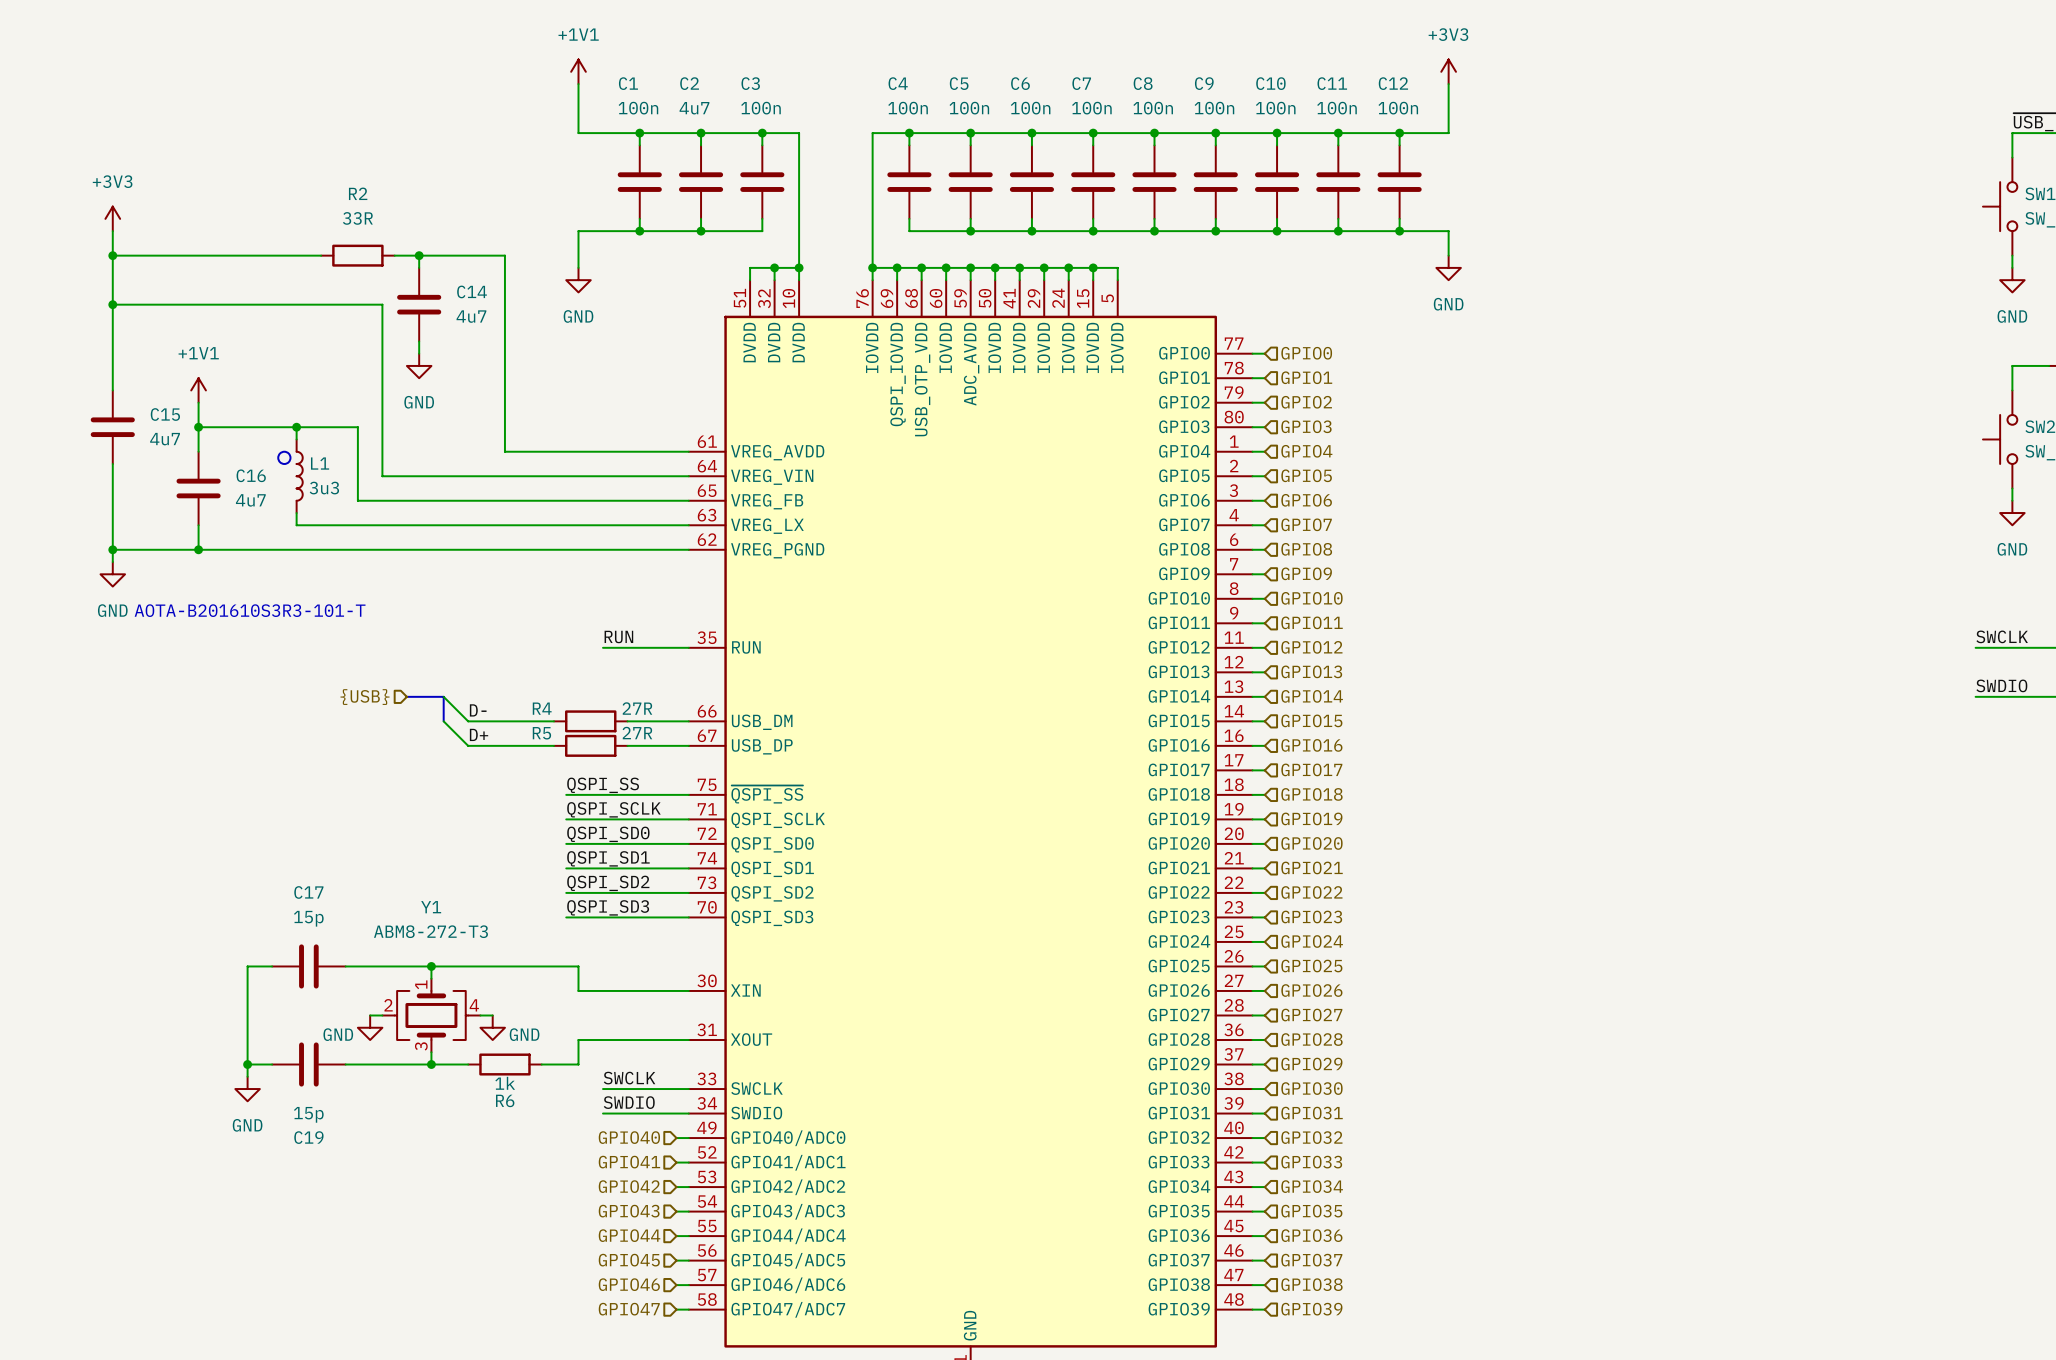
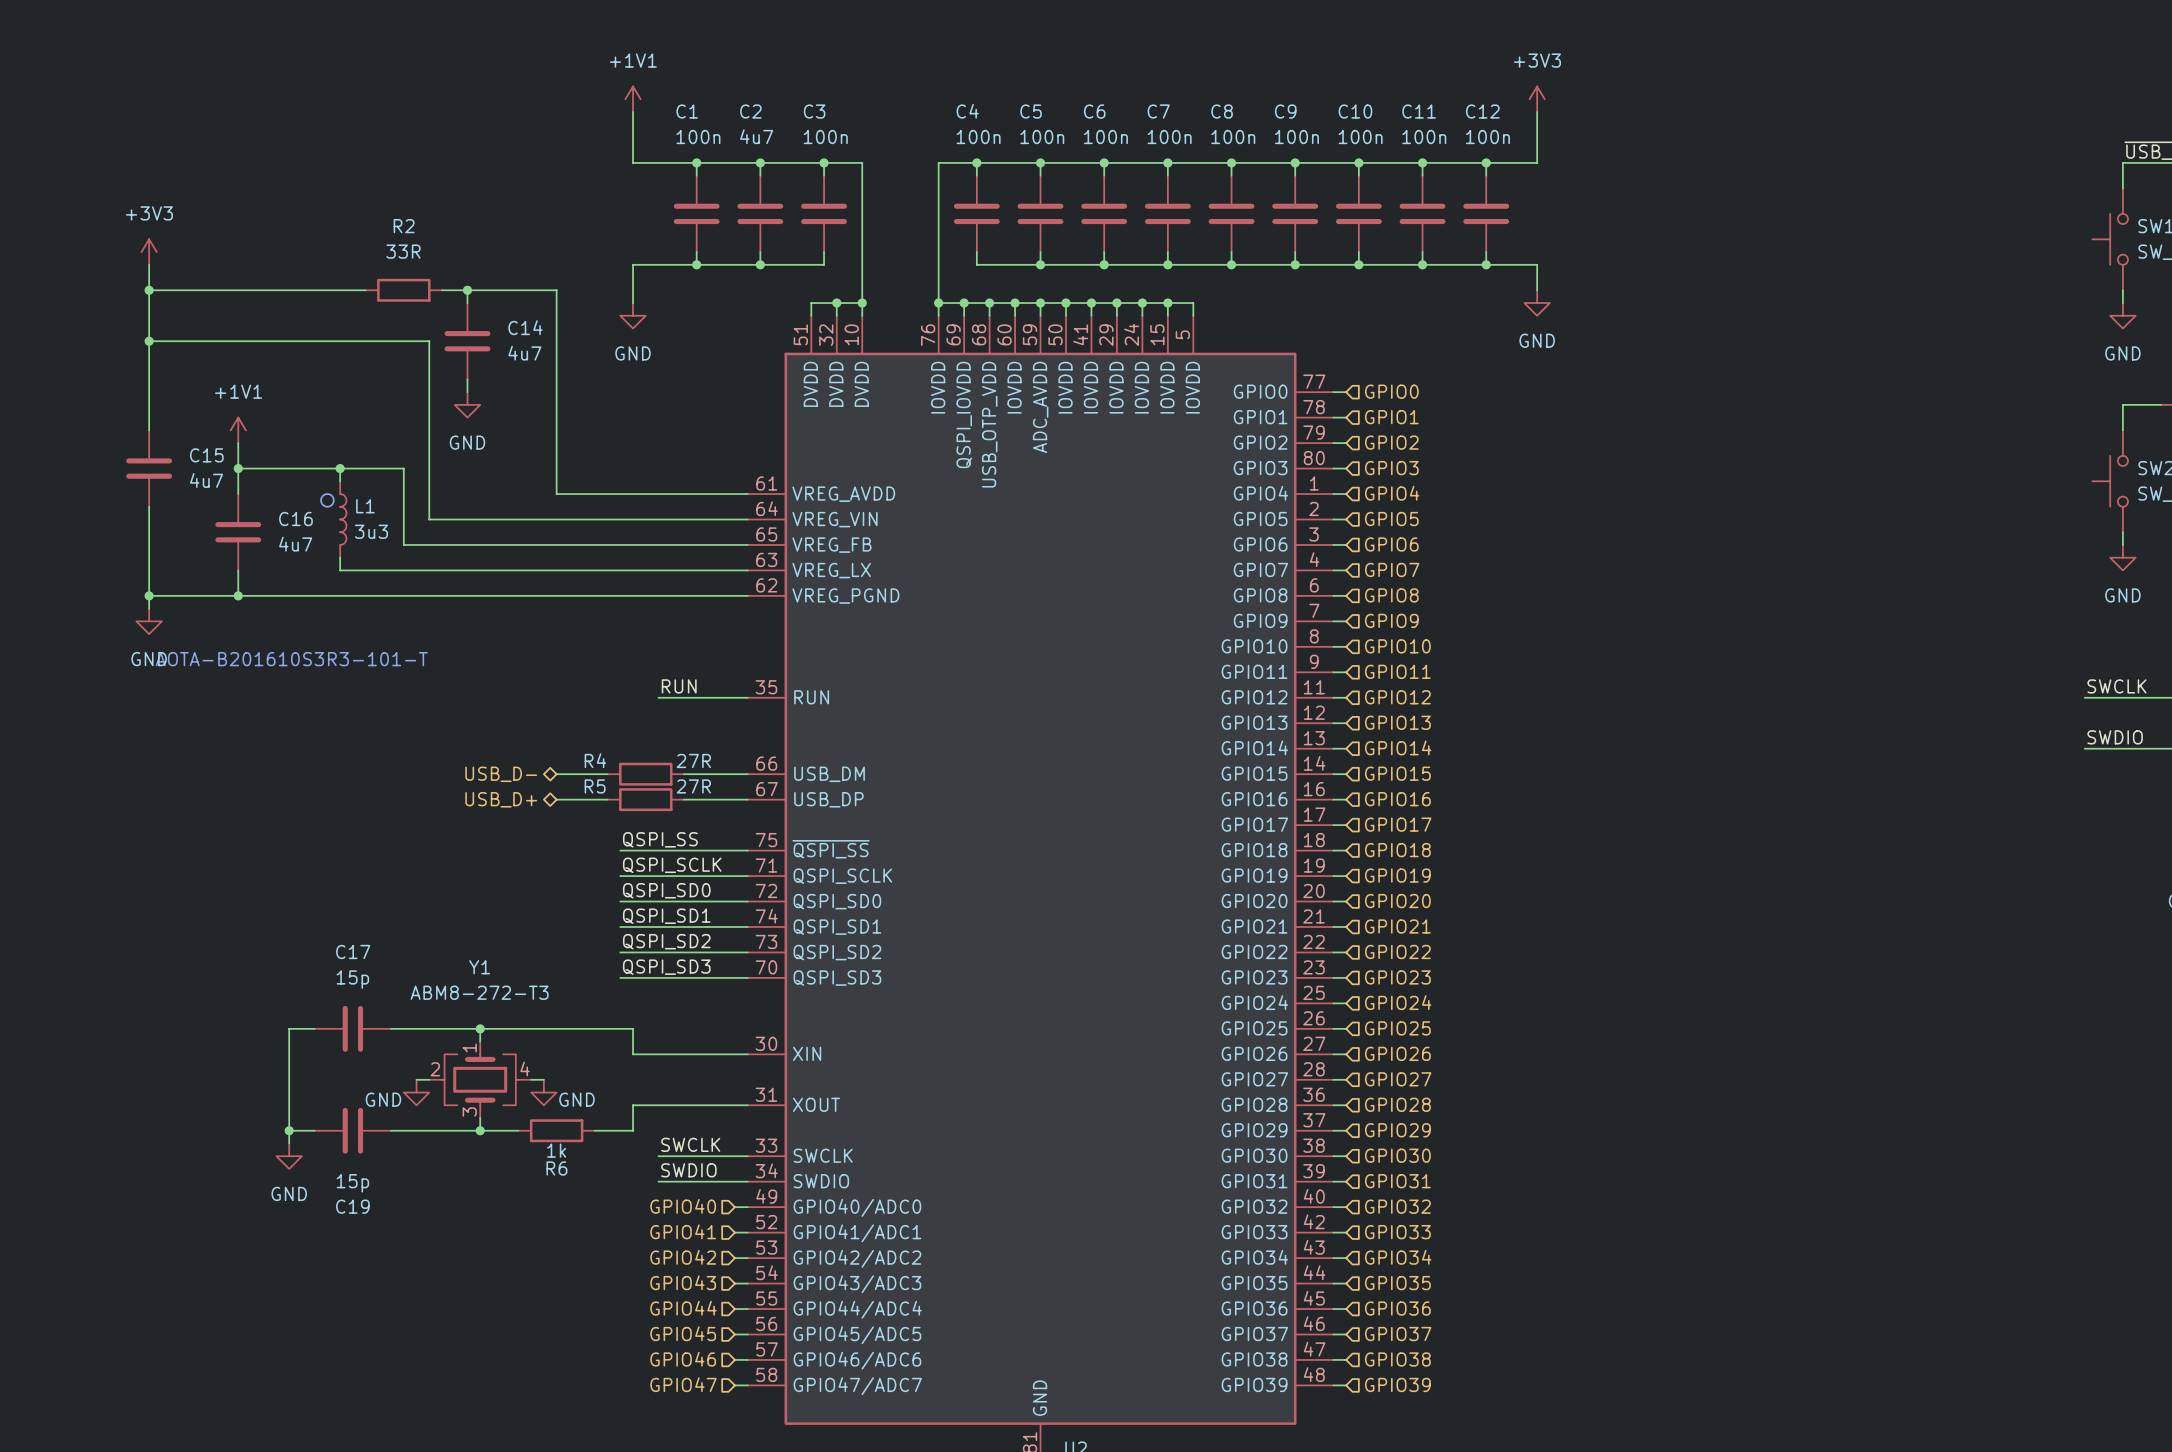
bus: (406, 696) (443, 696) (443, 721) -> none
wire: (443, 696) (468, 721) (504, 721) -> none
hierarchical label: {USB} (365, 697) -> none
label: D- (478, 710) -> none
wire: (443, 721) (468, 745) (504, 745) -> none
hierarchical label: none -> USB_D- (501, 774)
label: D+ (479, 734) -> none
hierarchical label: none -> USB_D+ (501, 799)

